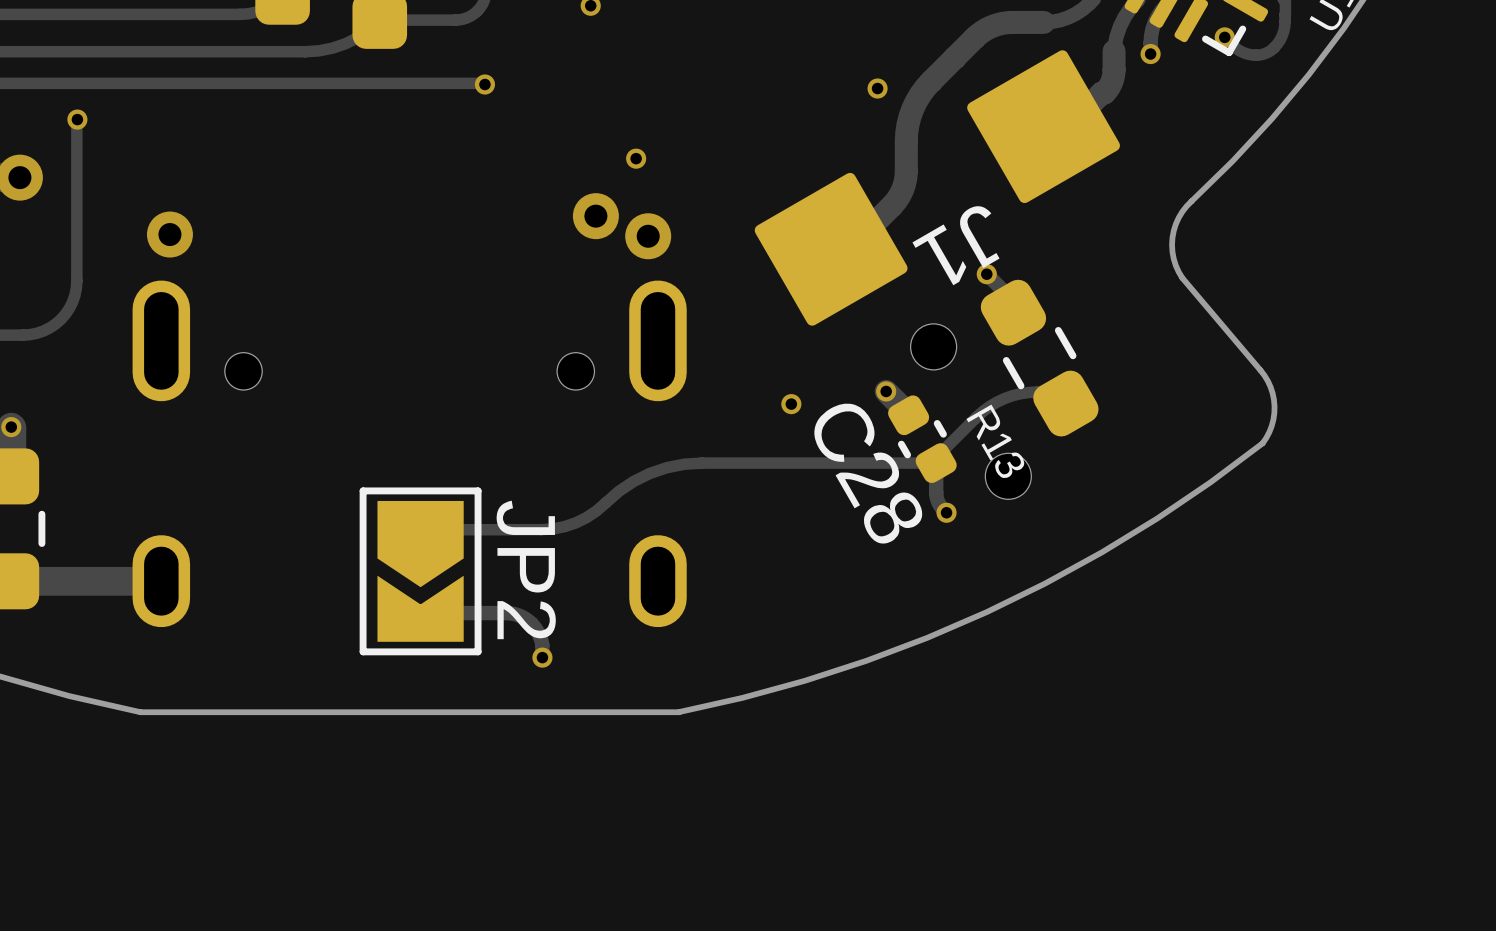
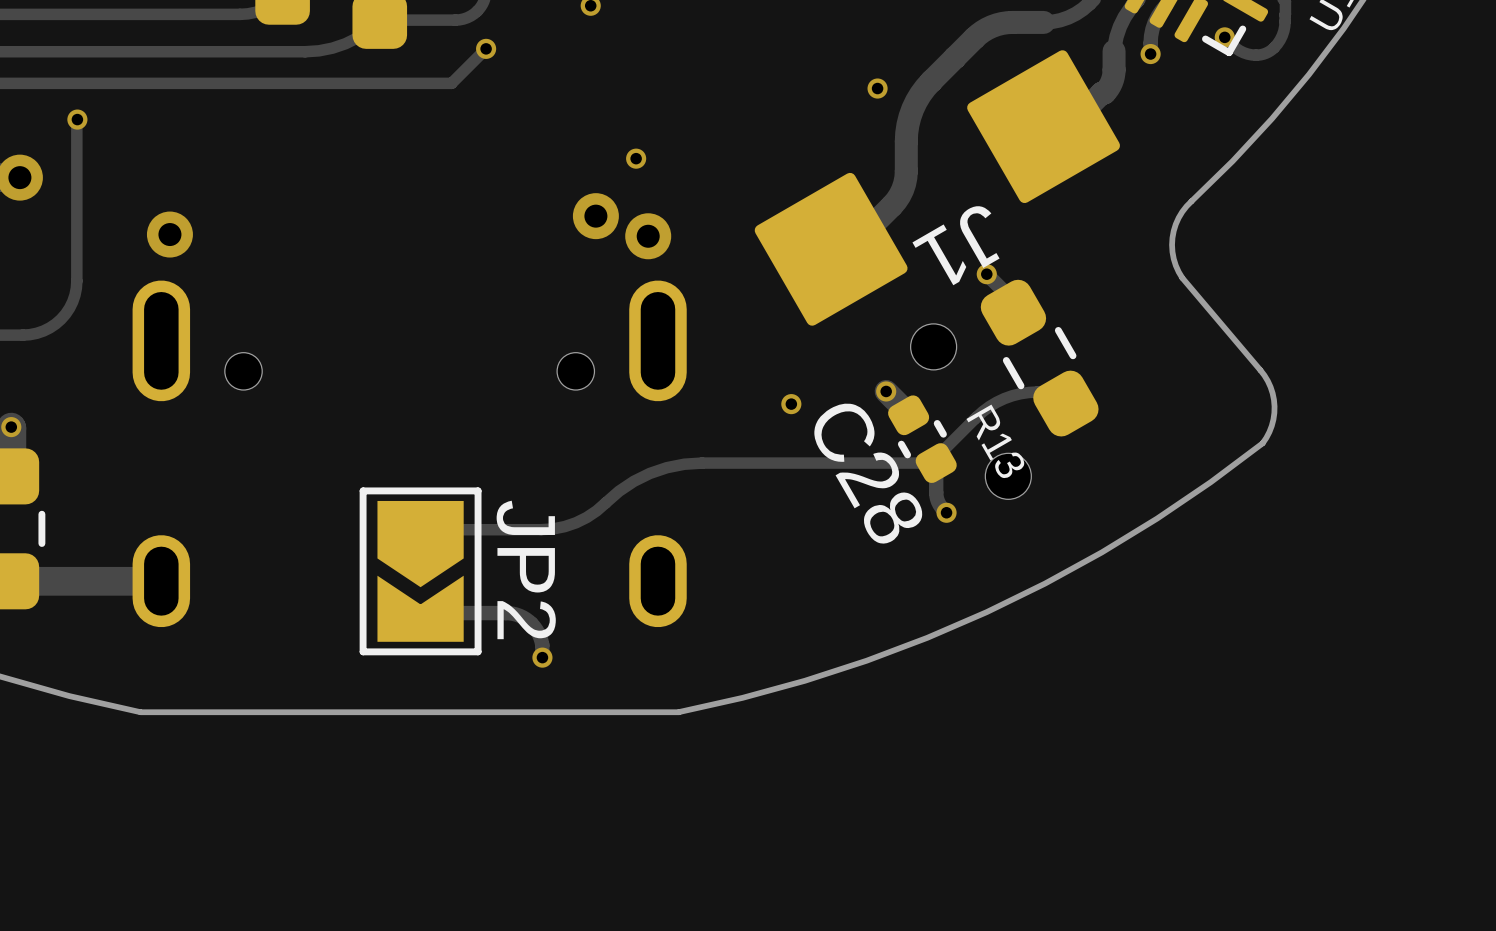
track: (451, 83) (484, 84) -> (451, 83) (486, 48)
via position: (484, 84) -> (486, 48)

